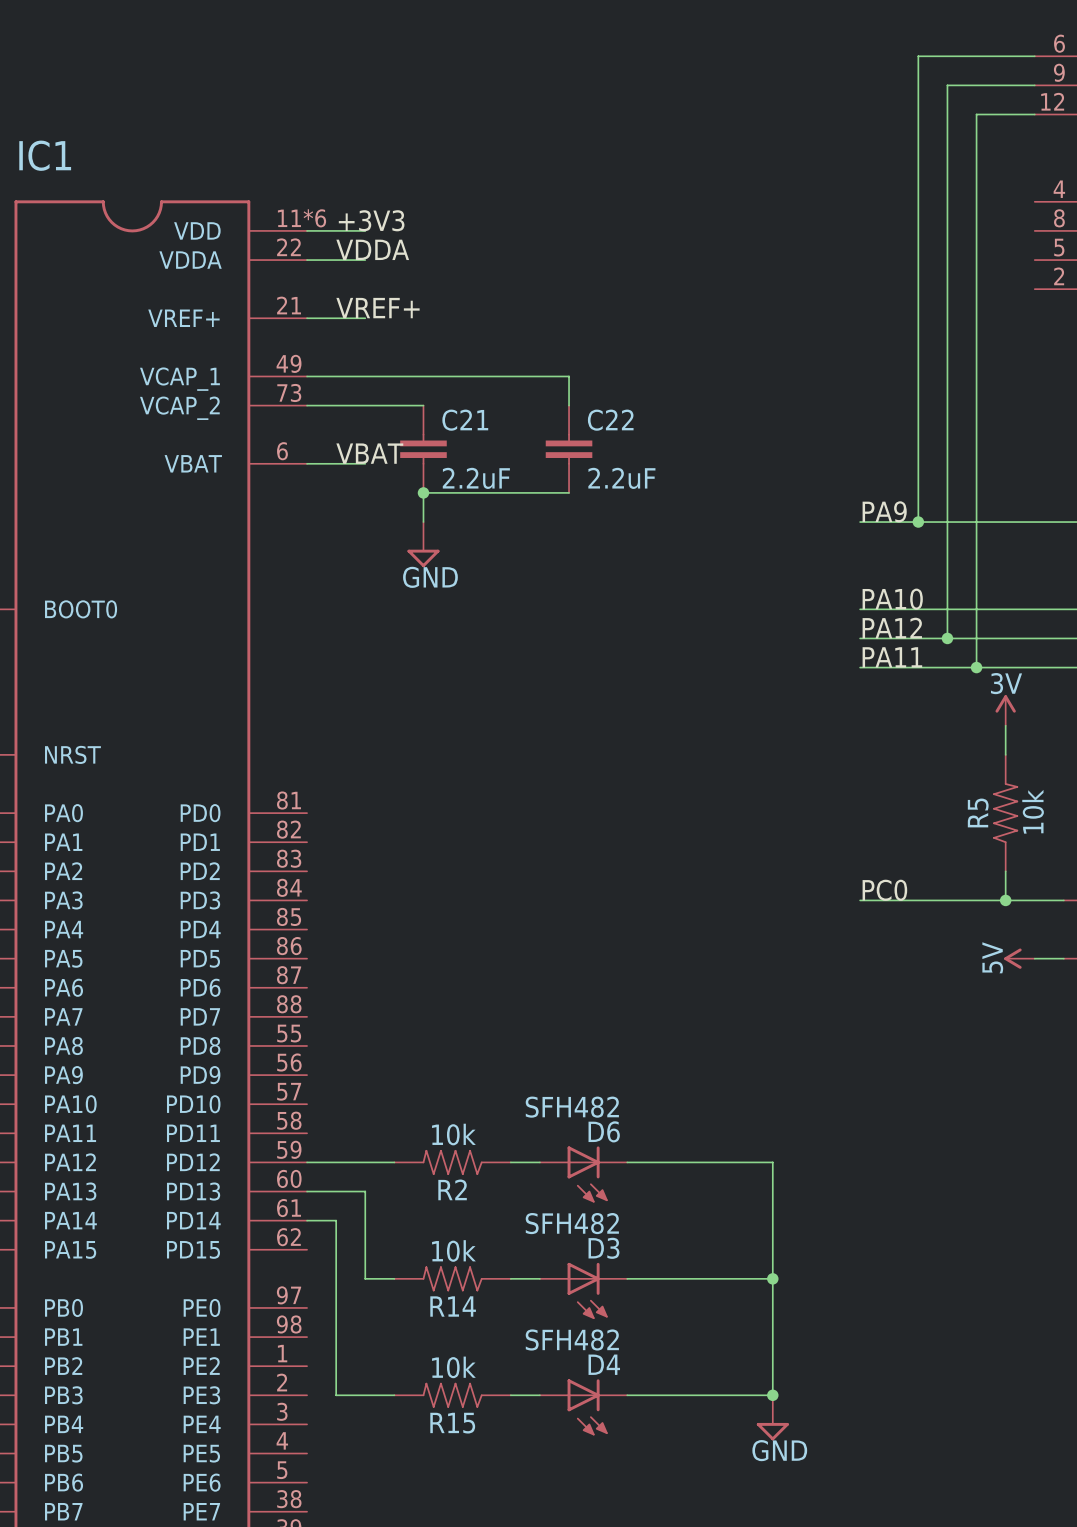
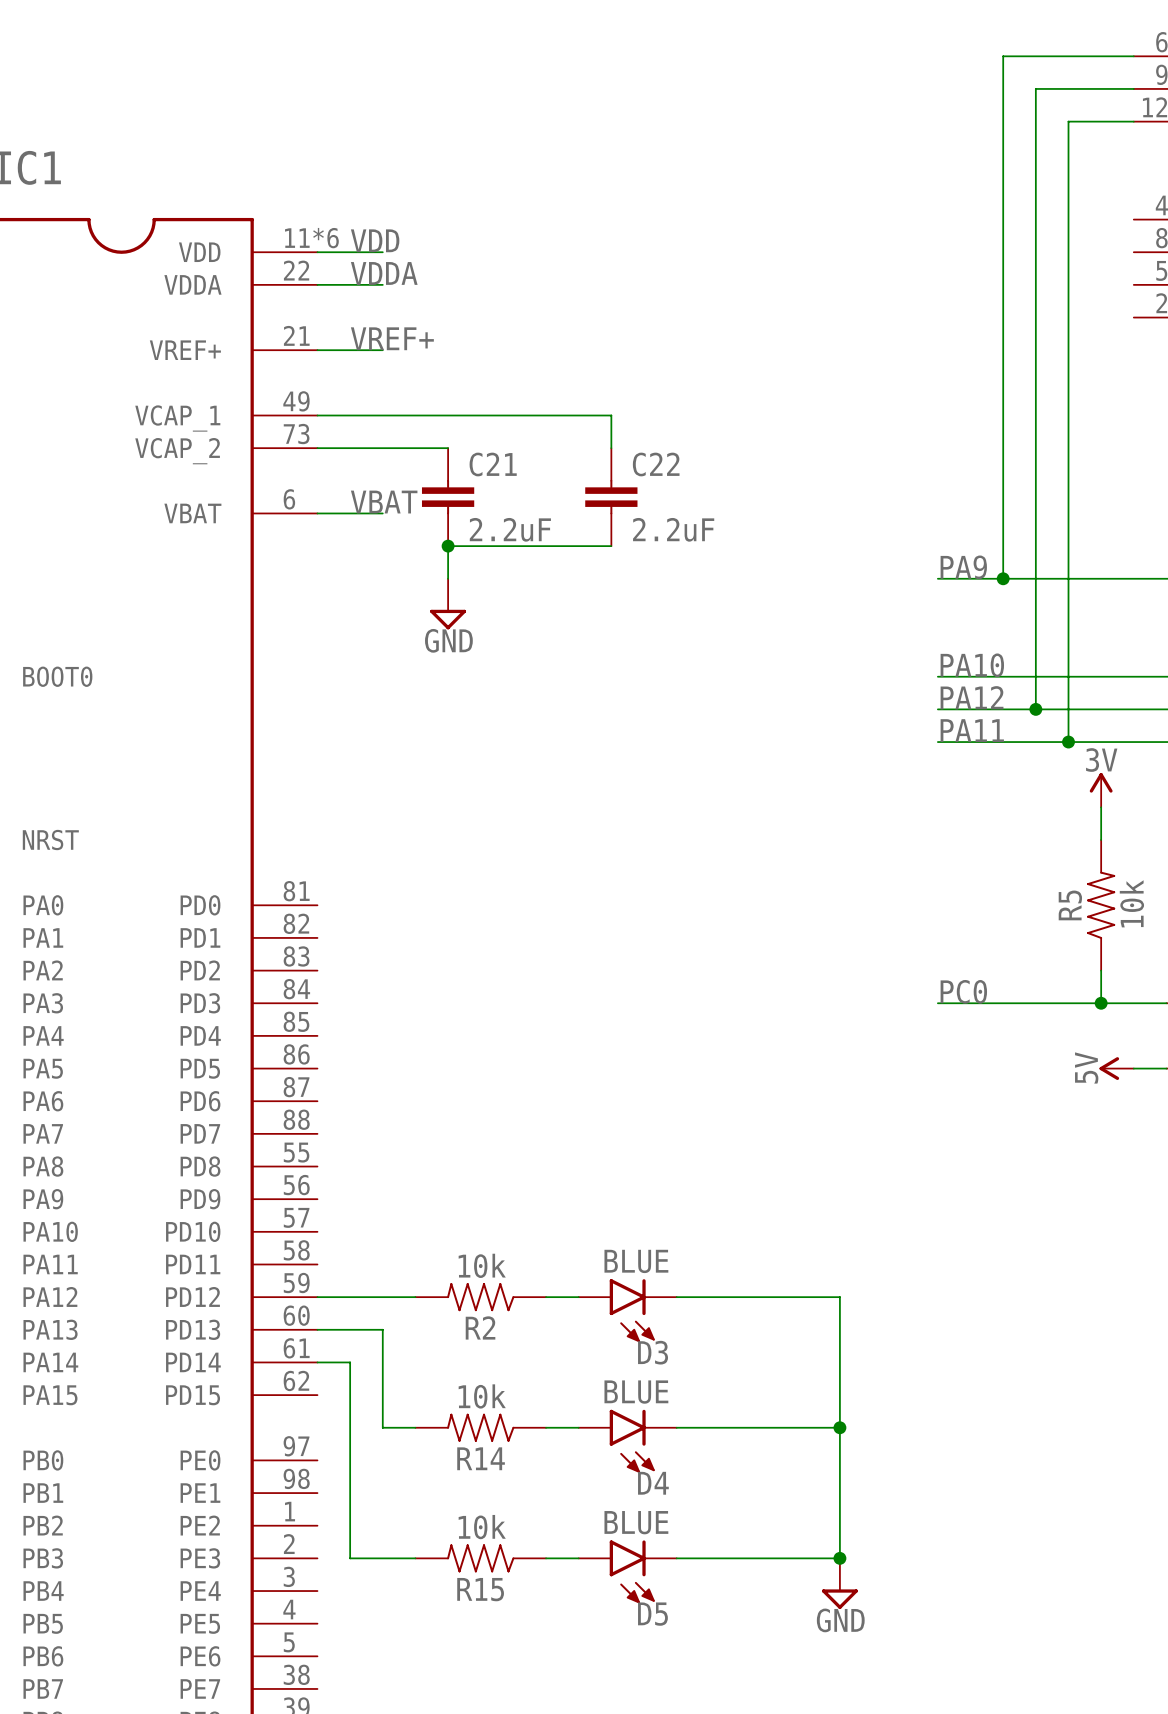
label: +3V3 (371, 220) -> VDD (375, 240)
D6: SFH482 (583, 1174) -> none
D3 value: SFH482 (572, 1223) -> BLUE (636, 1261)
D3 name position: D3 (603, 1248) -> D3 (653, 1352)
D3 symbol: [539, 1262, 628, 1320] -> [578, 1279, 677, 1343]
D4 value: SFH482 (572, 1340) -> BLUE (636, 1392)
D4 name position: D4 (604, 1364) -> D4 (653, 1483)
D4 symbol: [539, 1379, 628, 1436] -> [578, 1409, 677, 1473]
D5: none -> BLUE (627, 1571)

